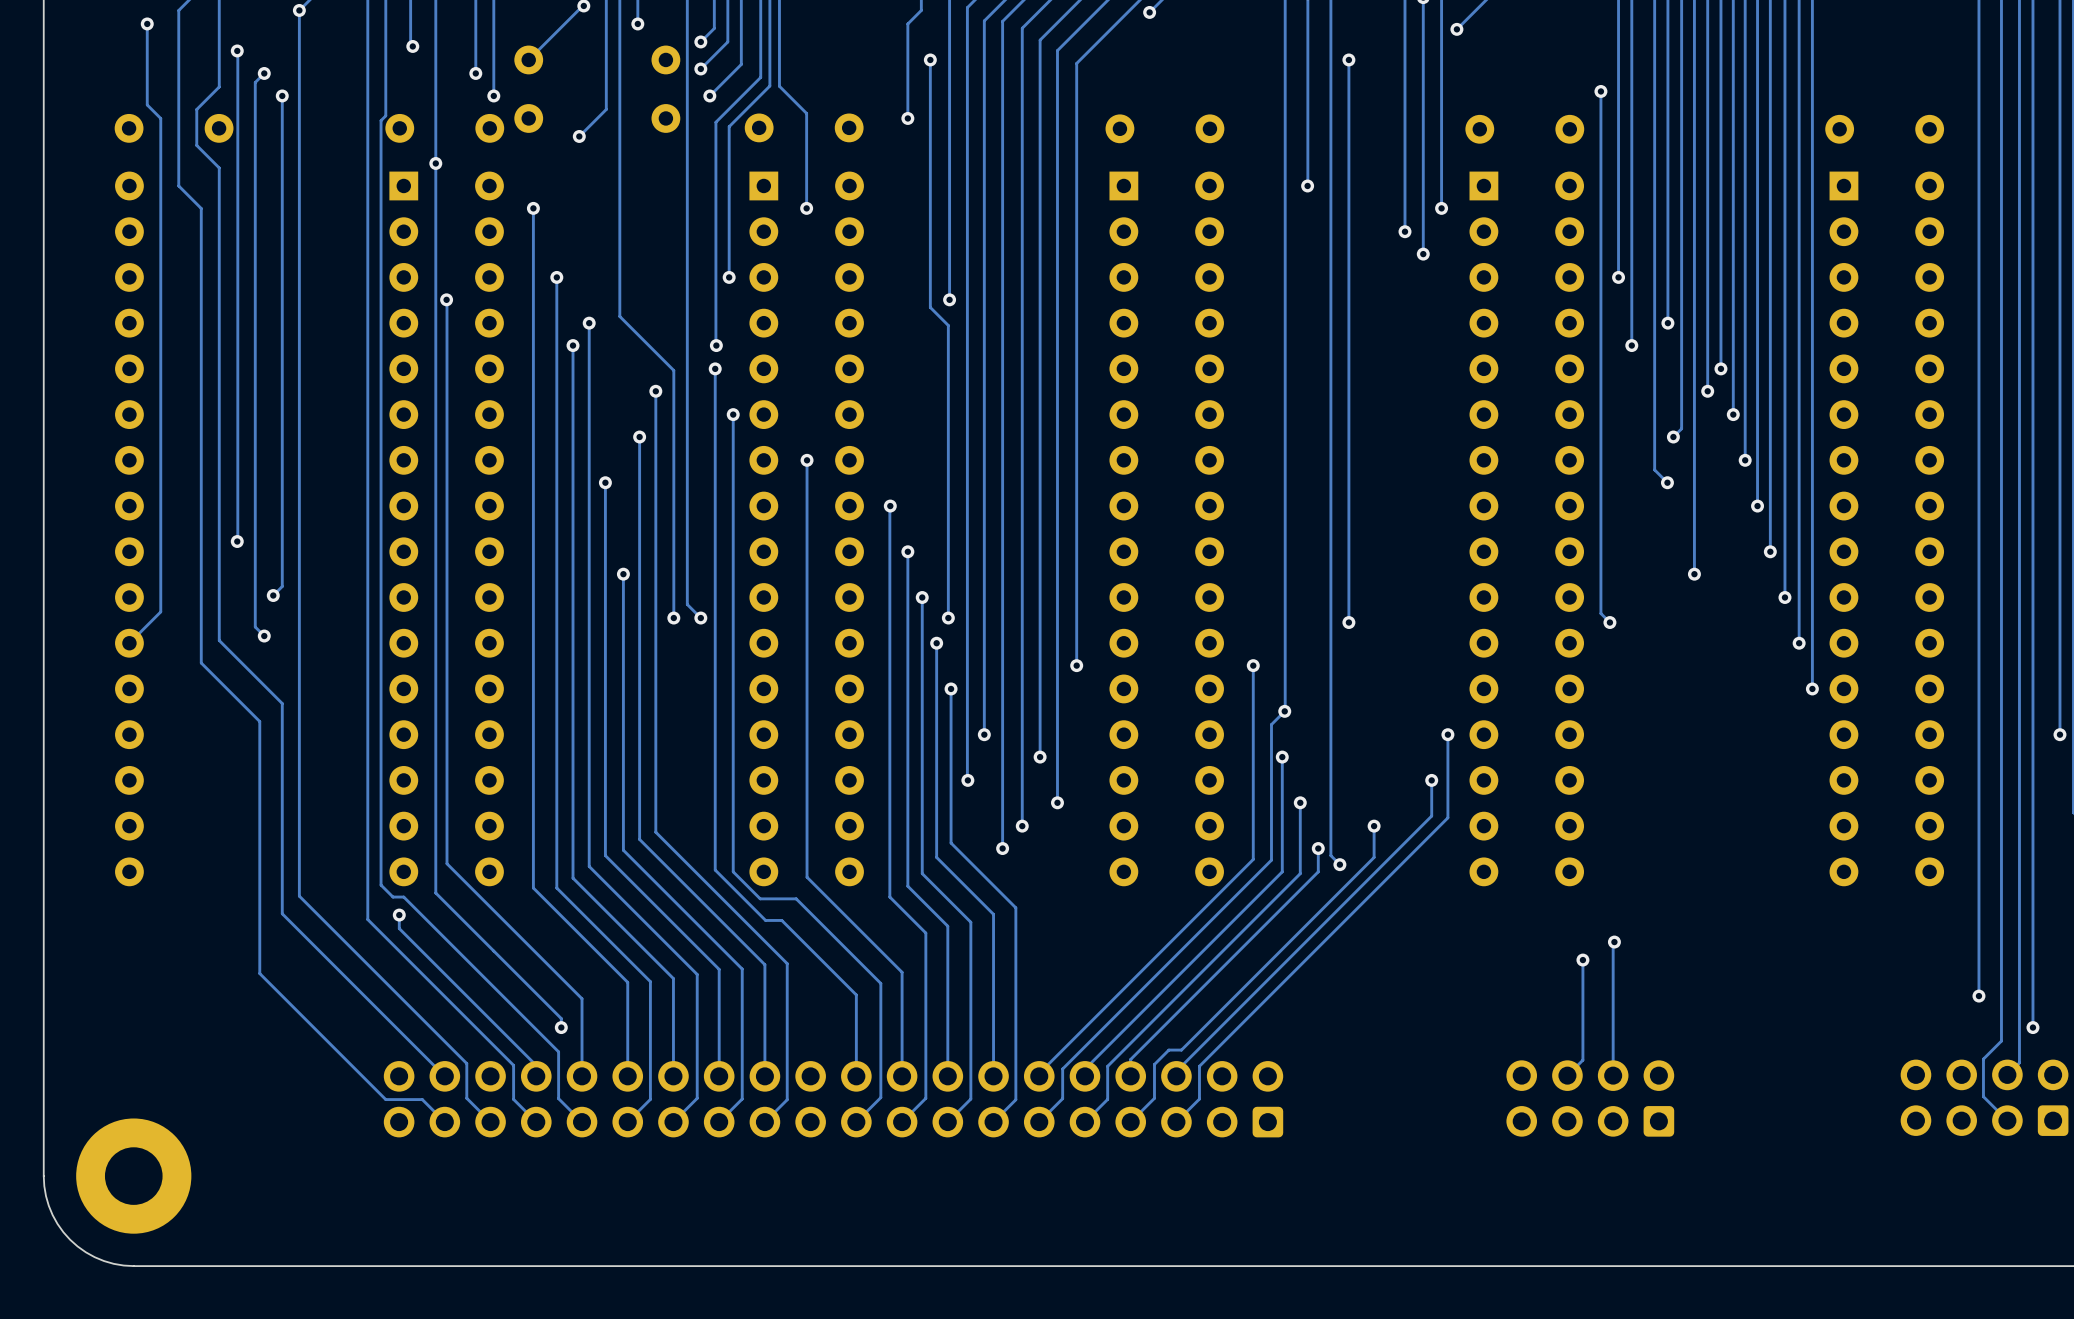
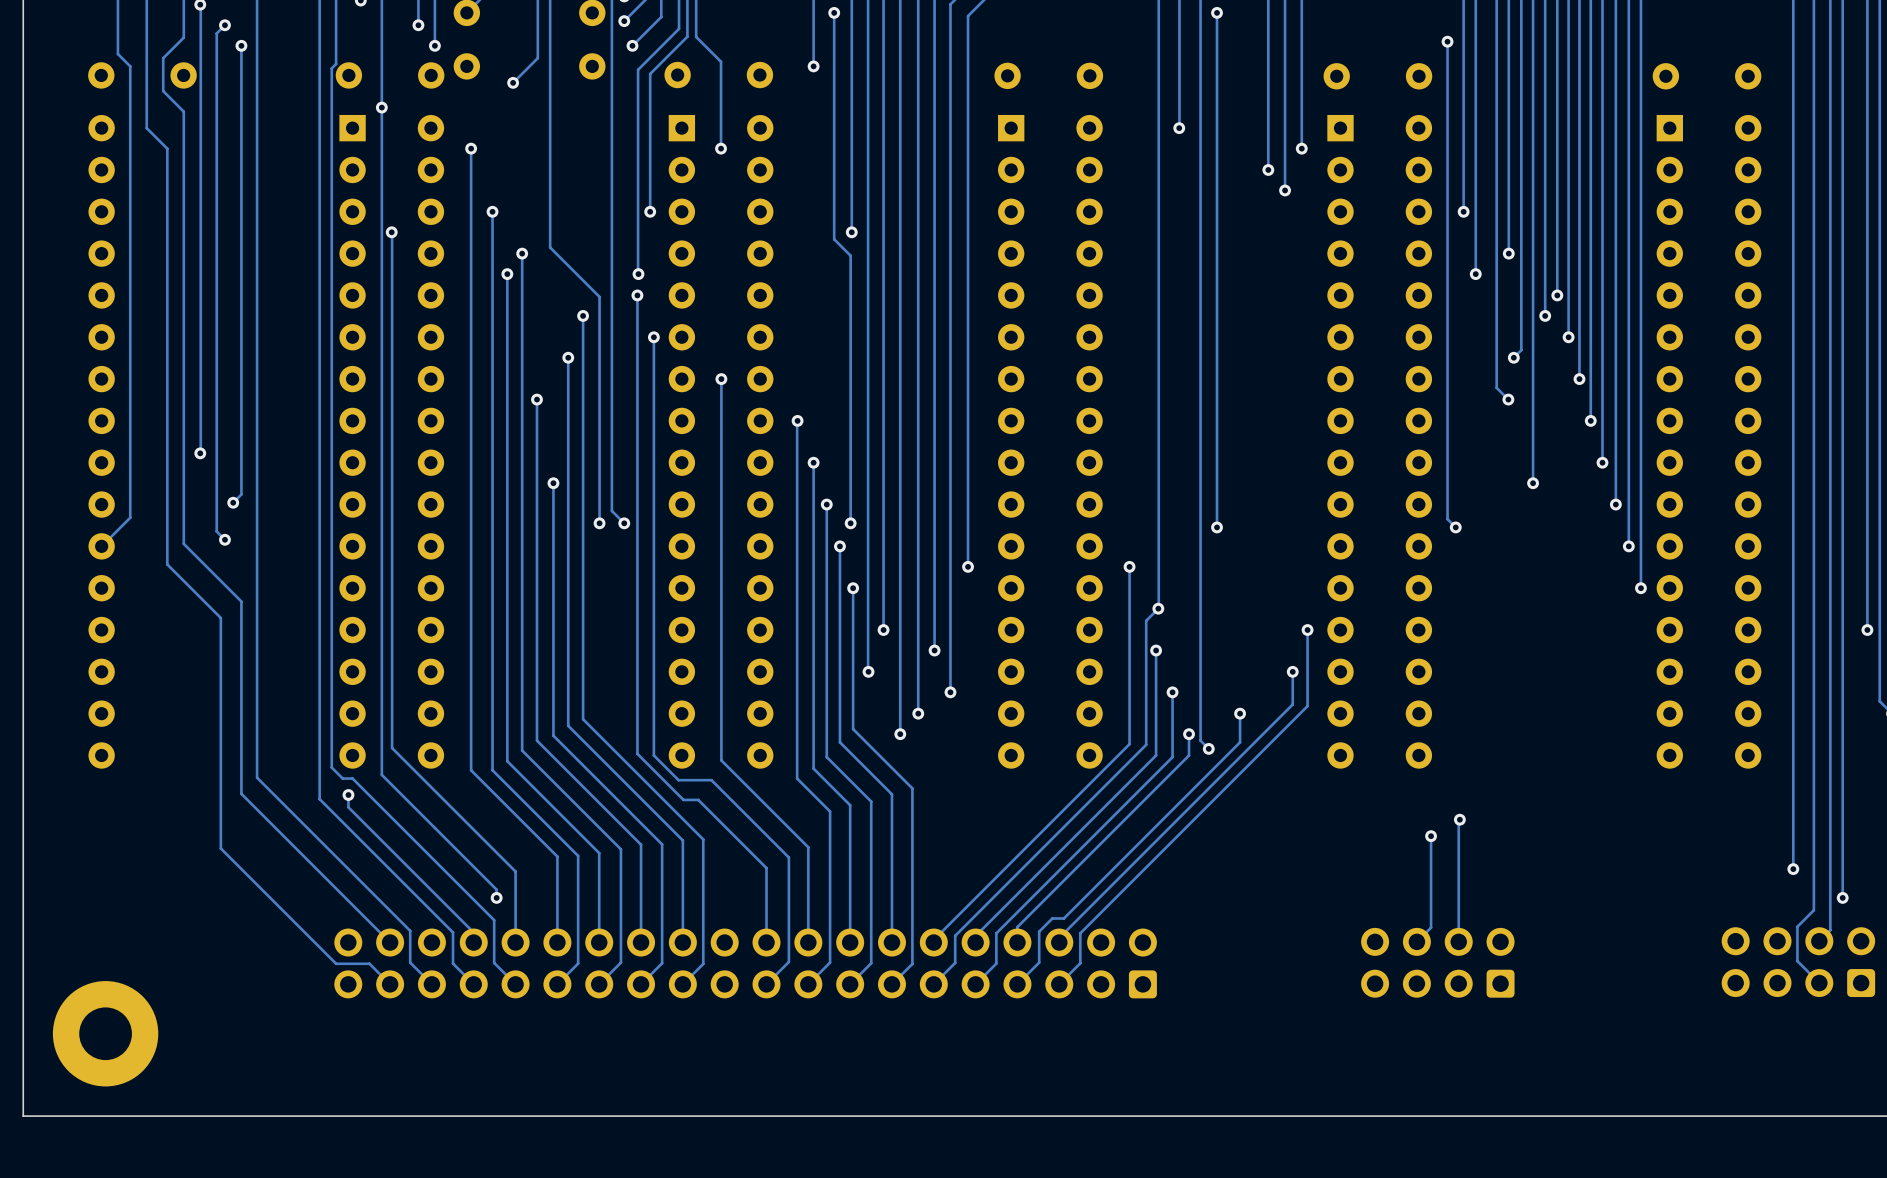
board edge: (43, 1176) (46, 1196) (52, 1215) (70, 1239) (94, 1257) (113, 1263) (133, 1266) -> (23, 1033) (23, 1116) (105, 1116)

